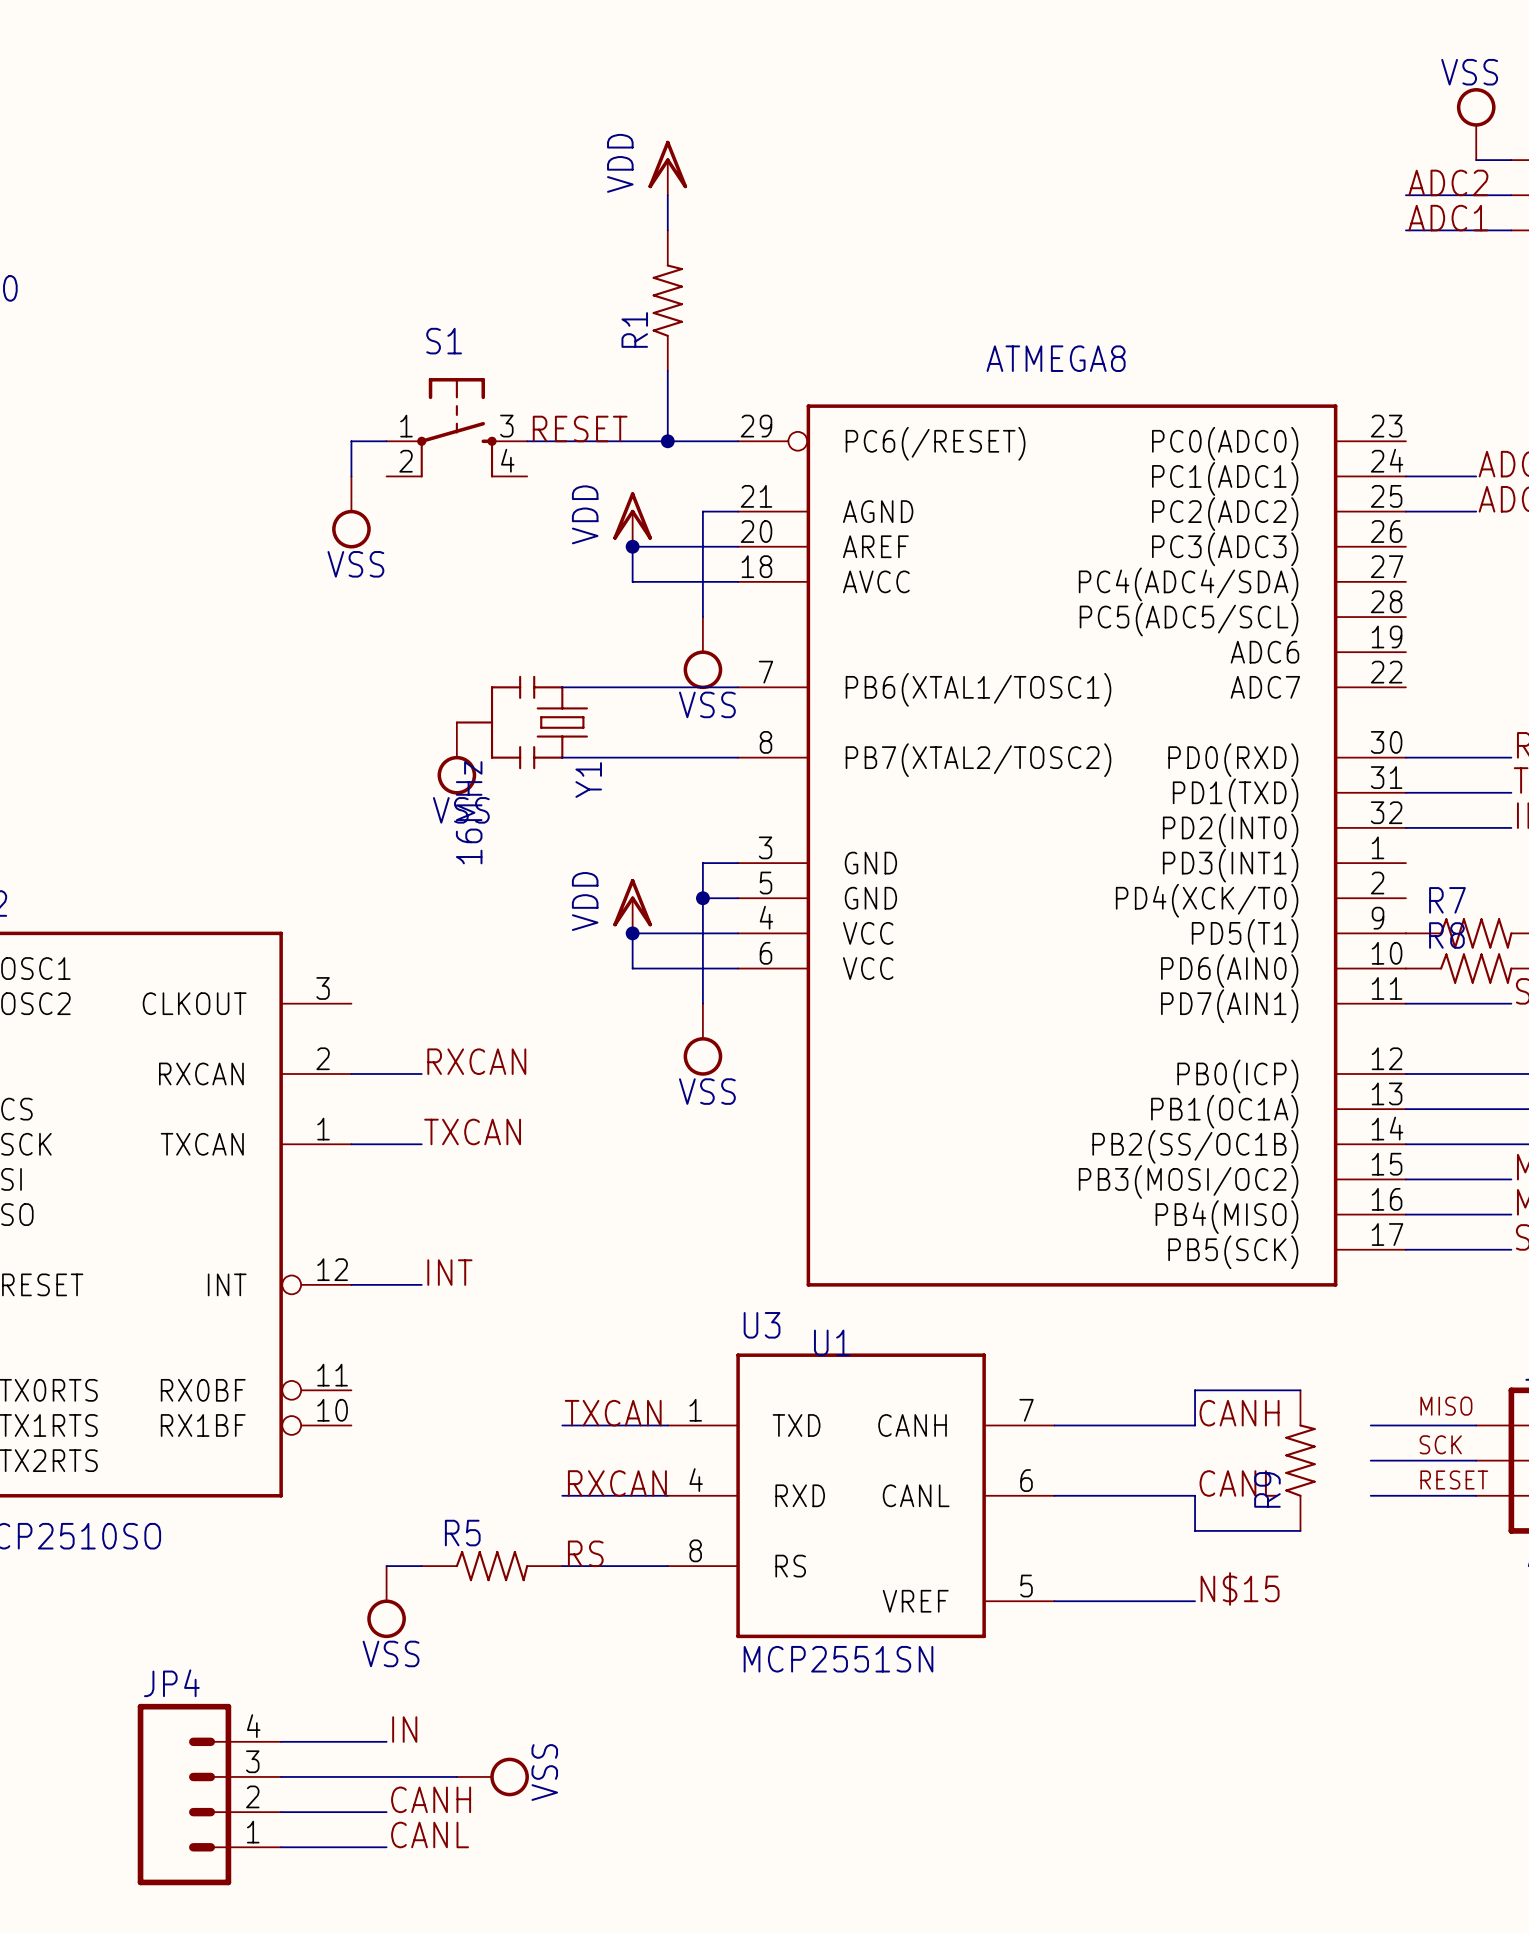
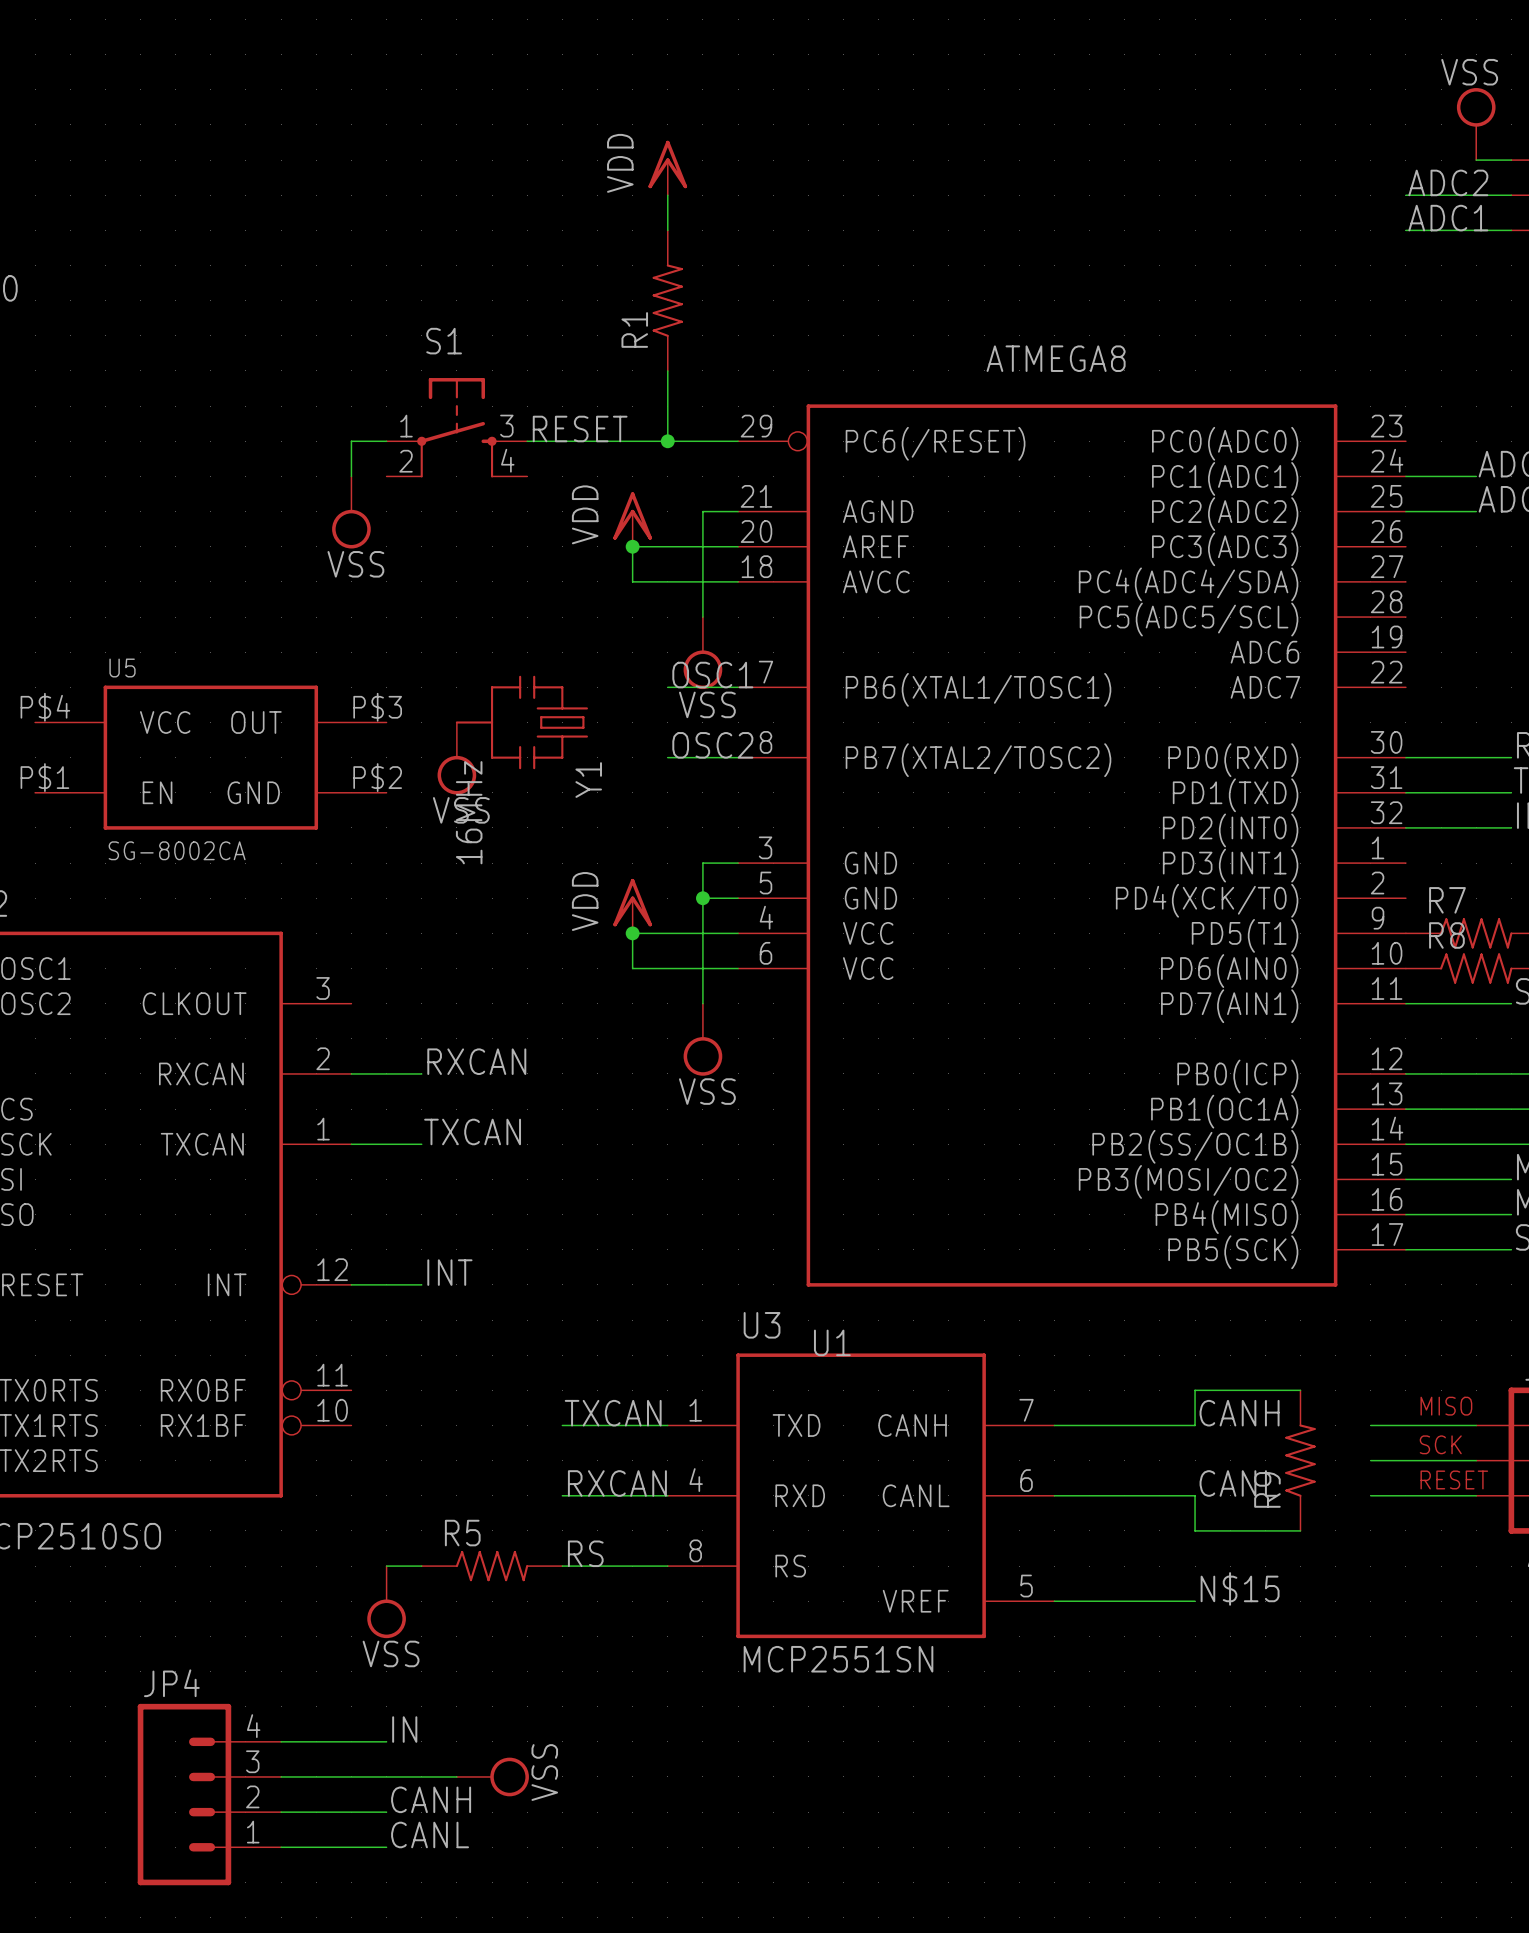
label: none -> OSC1 (712, 675)
wire: (562, 687) (667, 687) -> none
label: none -> OSC2 (712, 745)
U5: none -> SG-8002CA (210, 757)
wire: (562, 757) (667, 757) -> none

